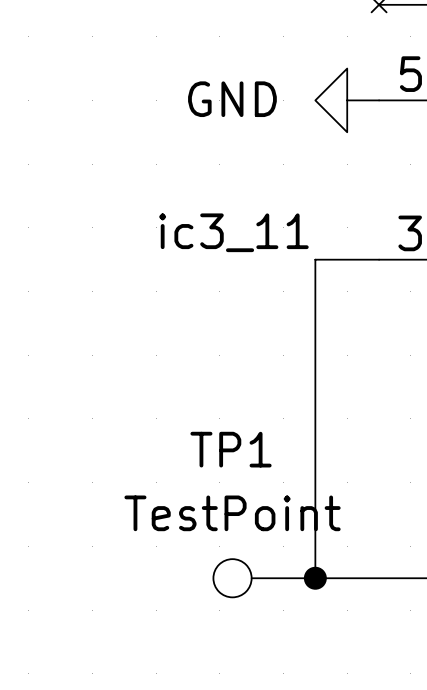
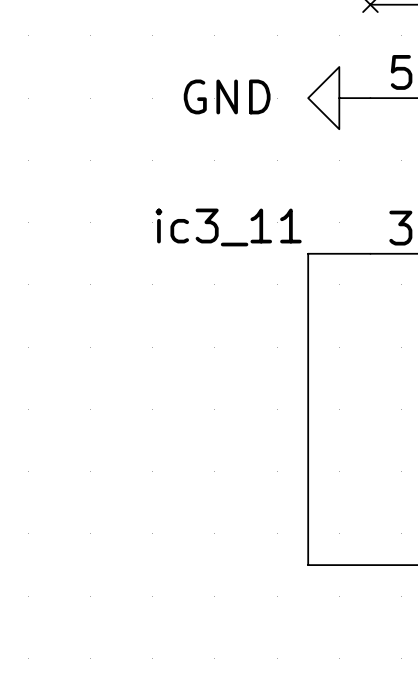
TP1: TestPoint (264, 578) -> none
junction: (315, 578) -> none

